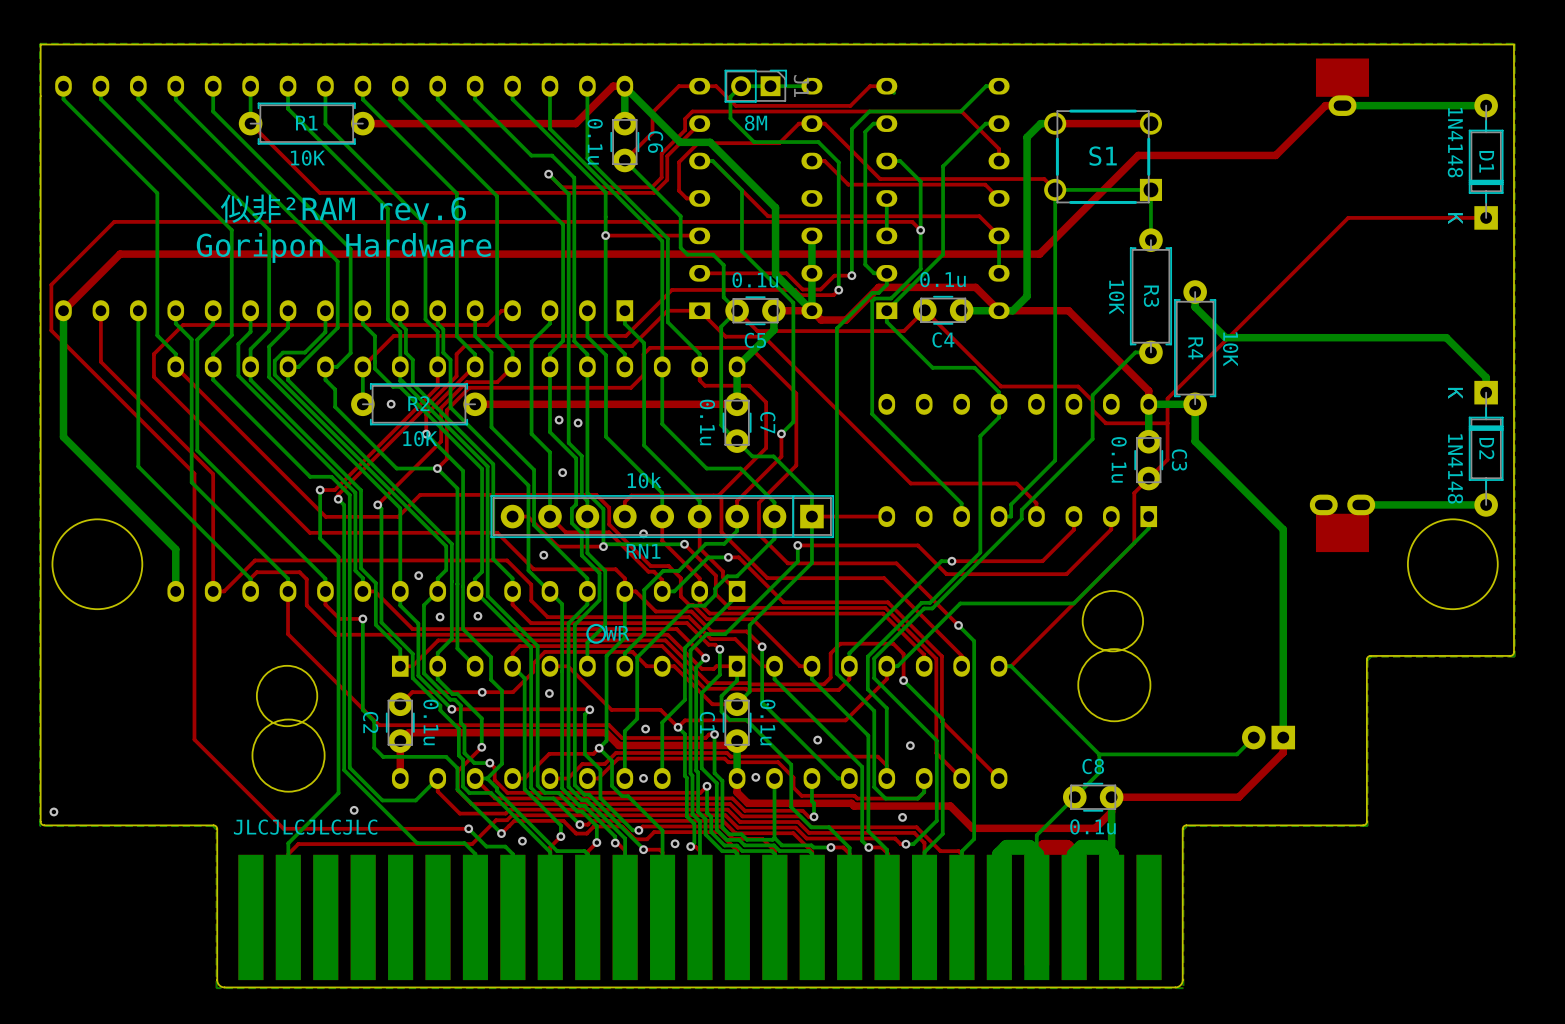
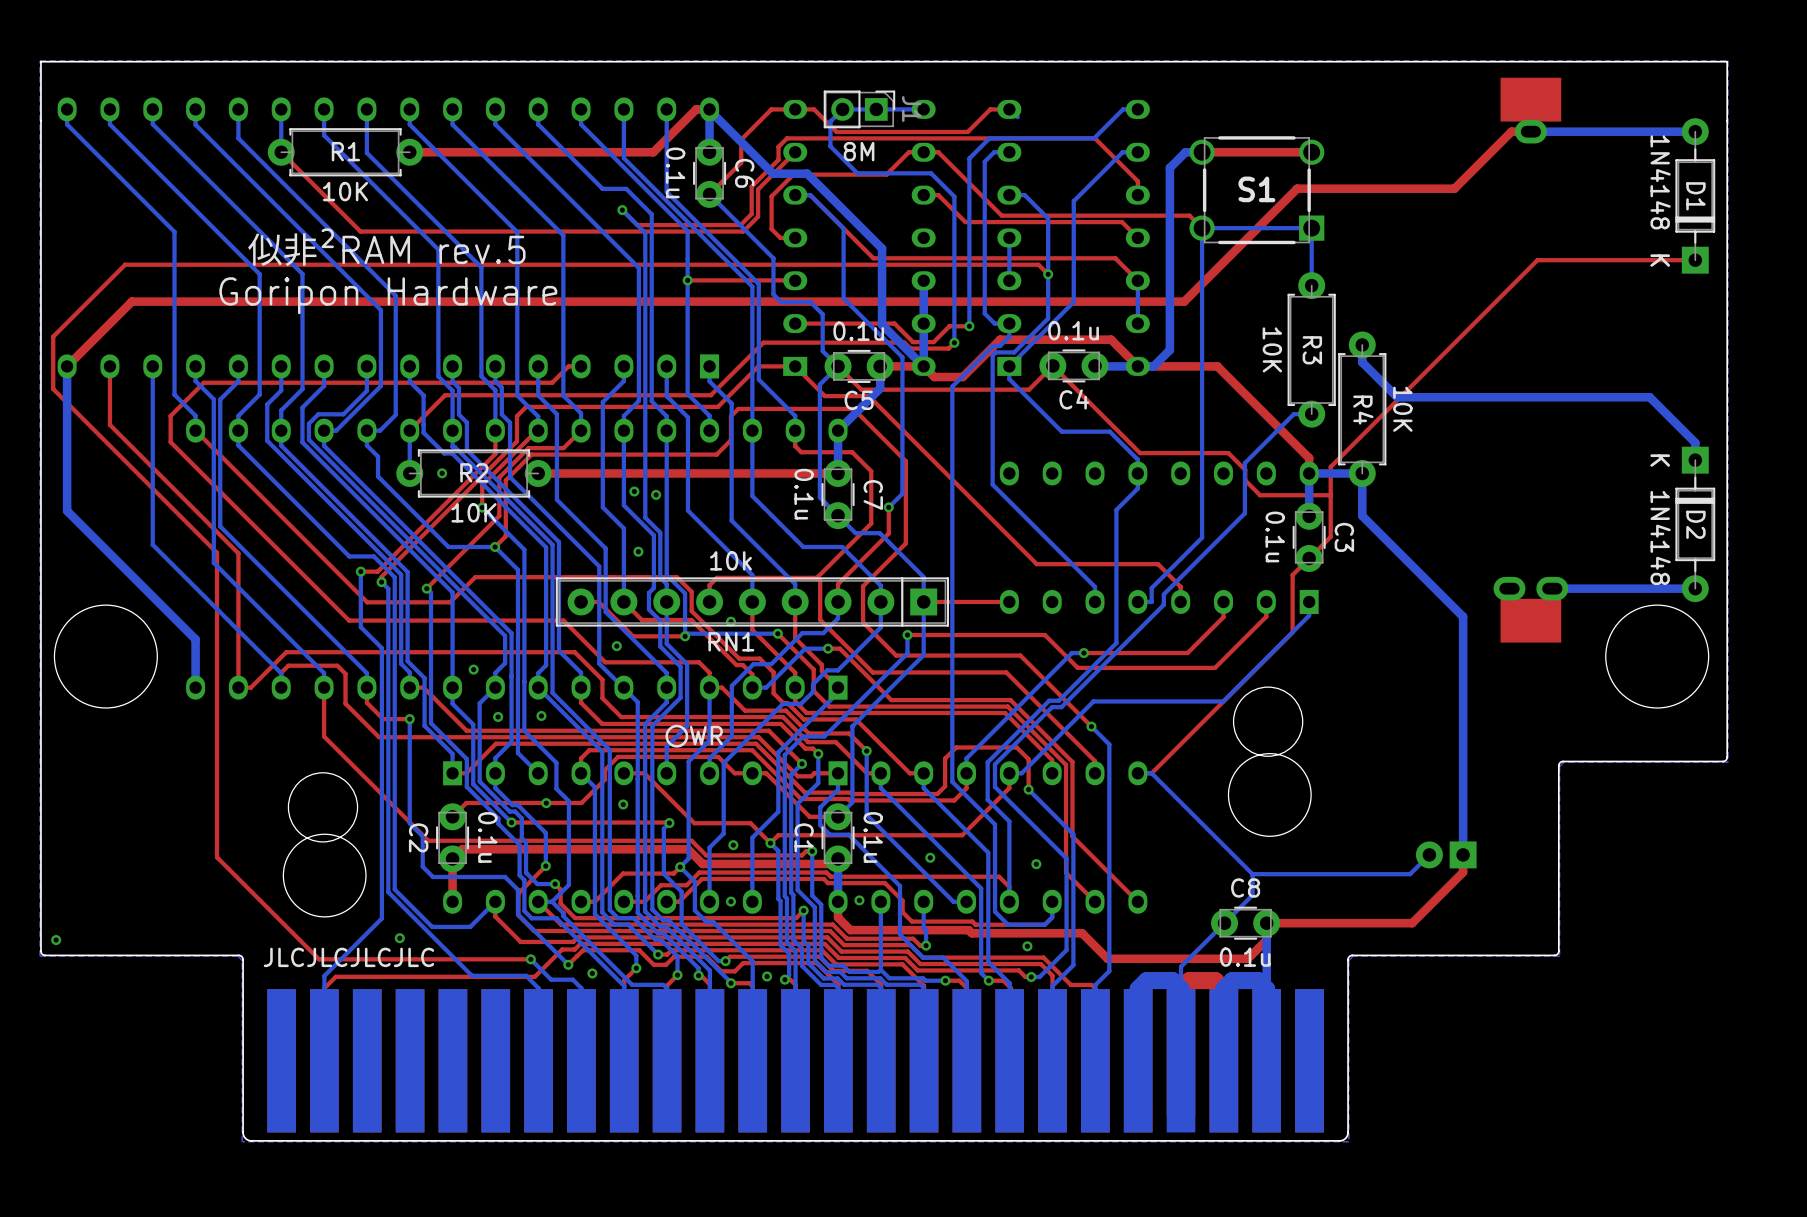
text: 似非²RAM rev.6 (343, 208) -> 似非²RAM rev.5 (386, 247)

